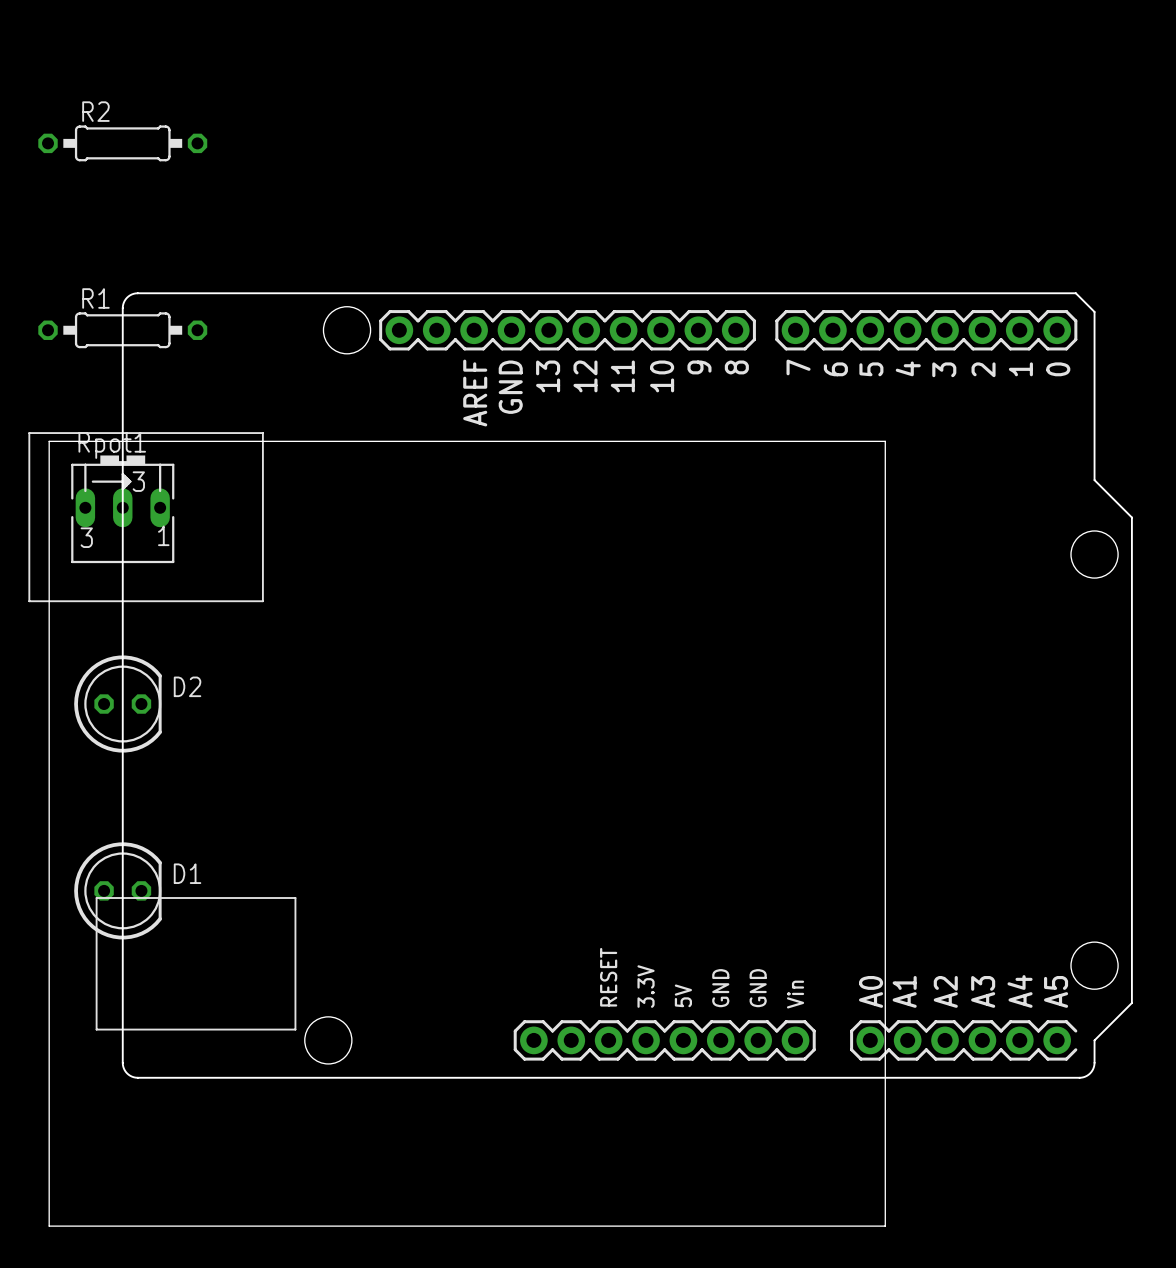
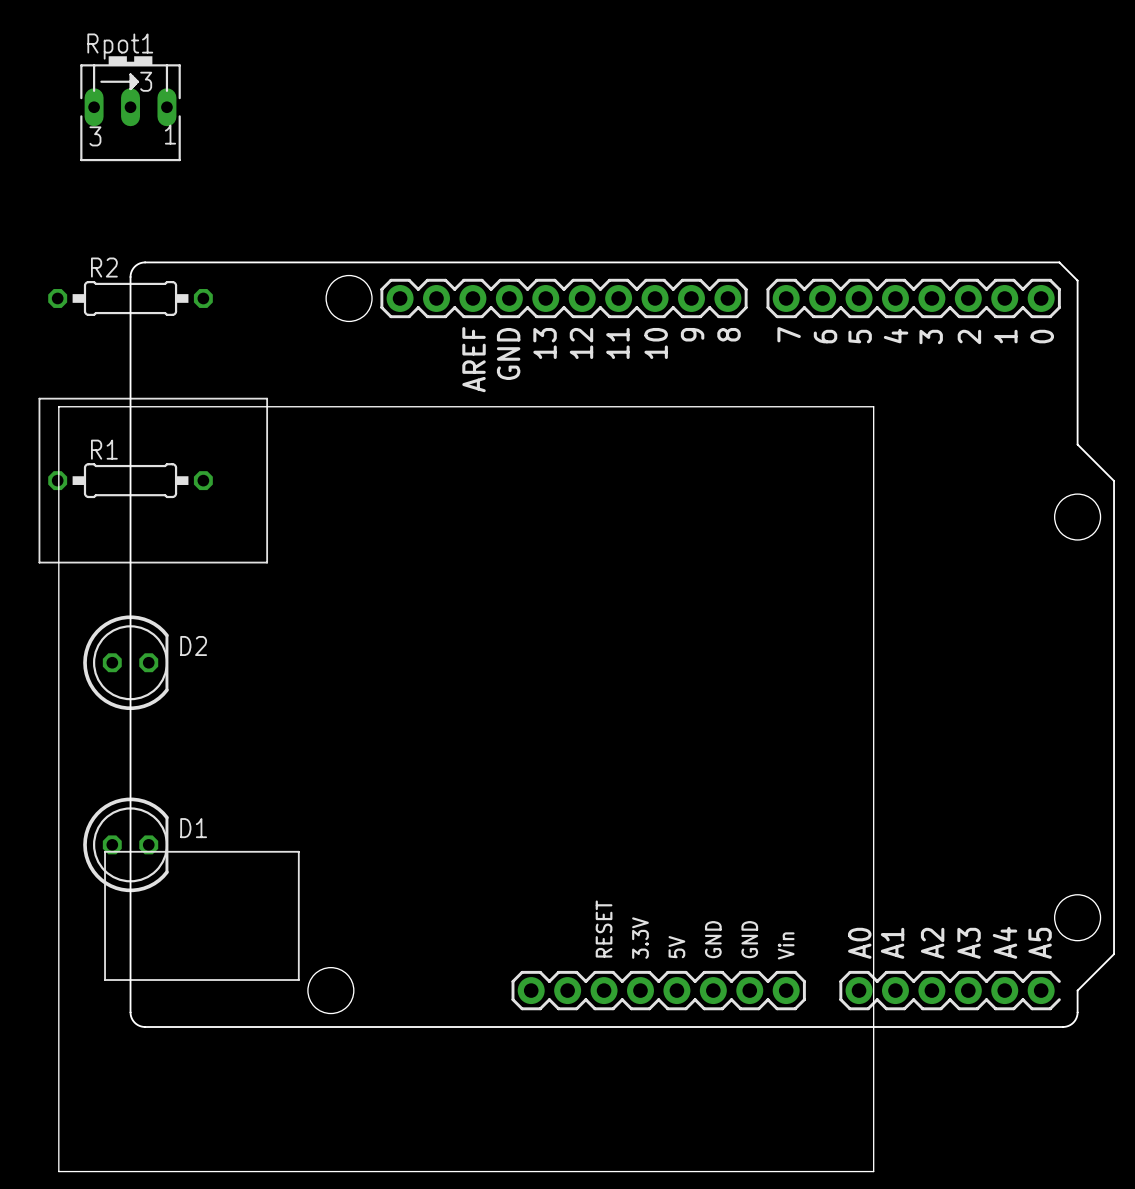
R2: (122, 143) -> none
R1 name: R1 (95, 298) -> R2 (104, 267)
Rpot1 position: (122, 509) -> (130, 108)
R1: none -> (130, 480)

